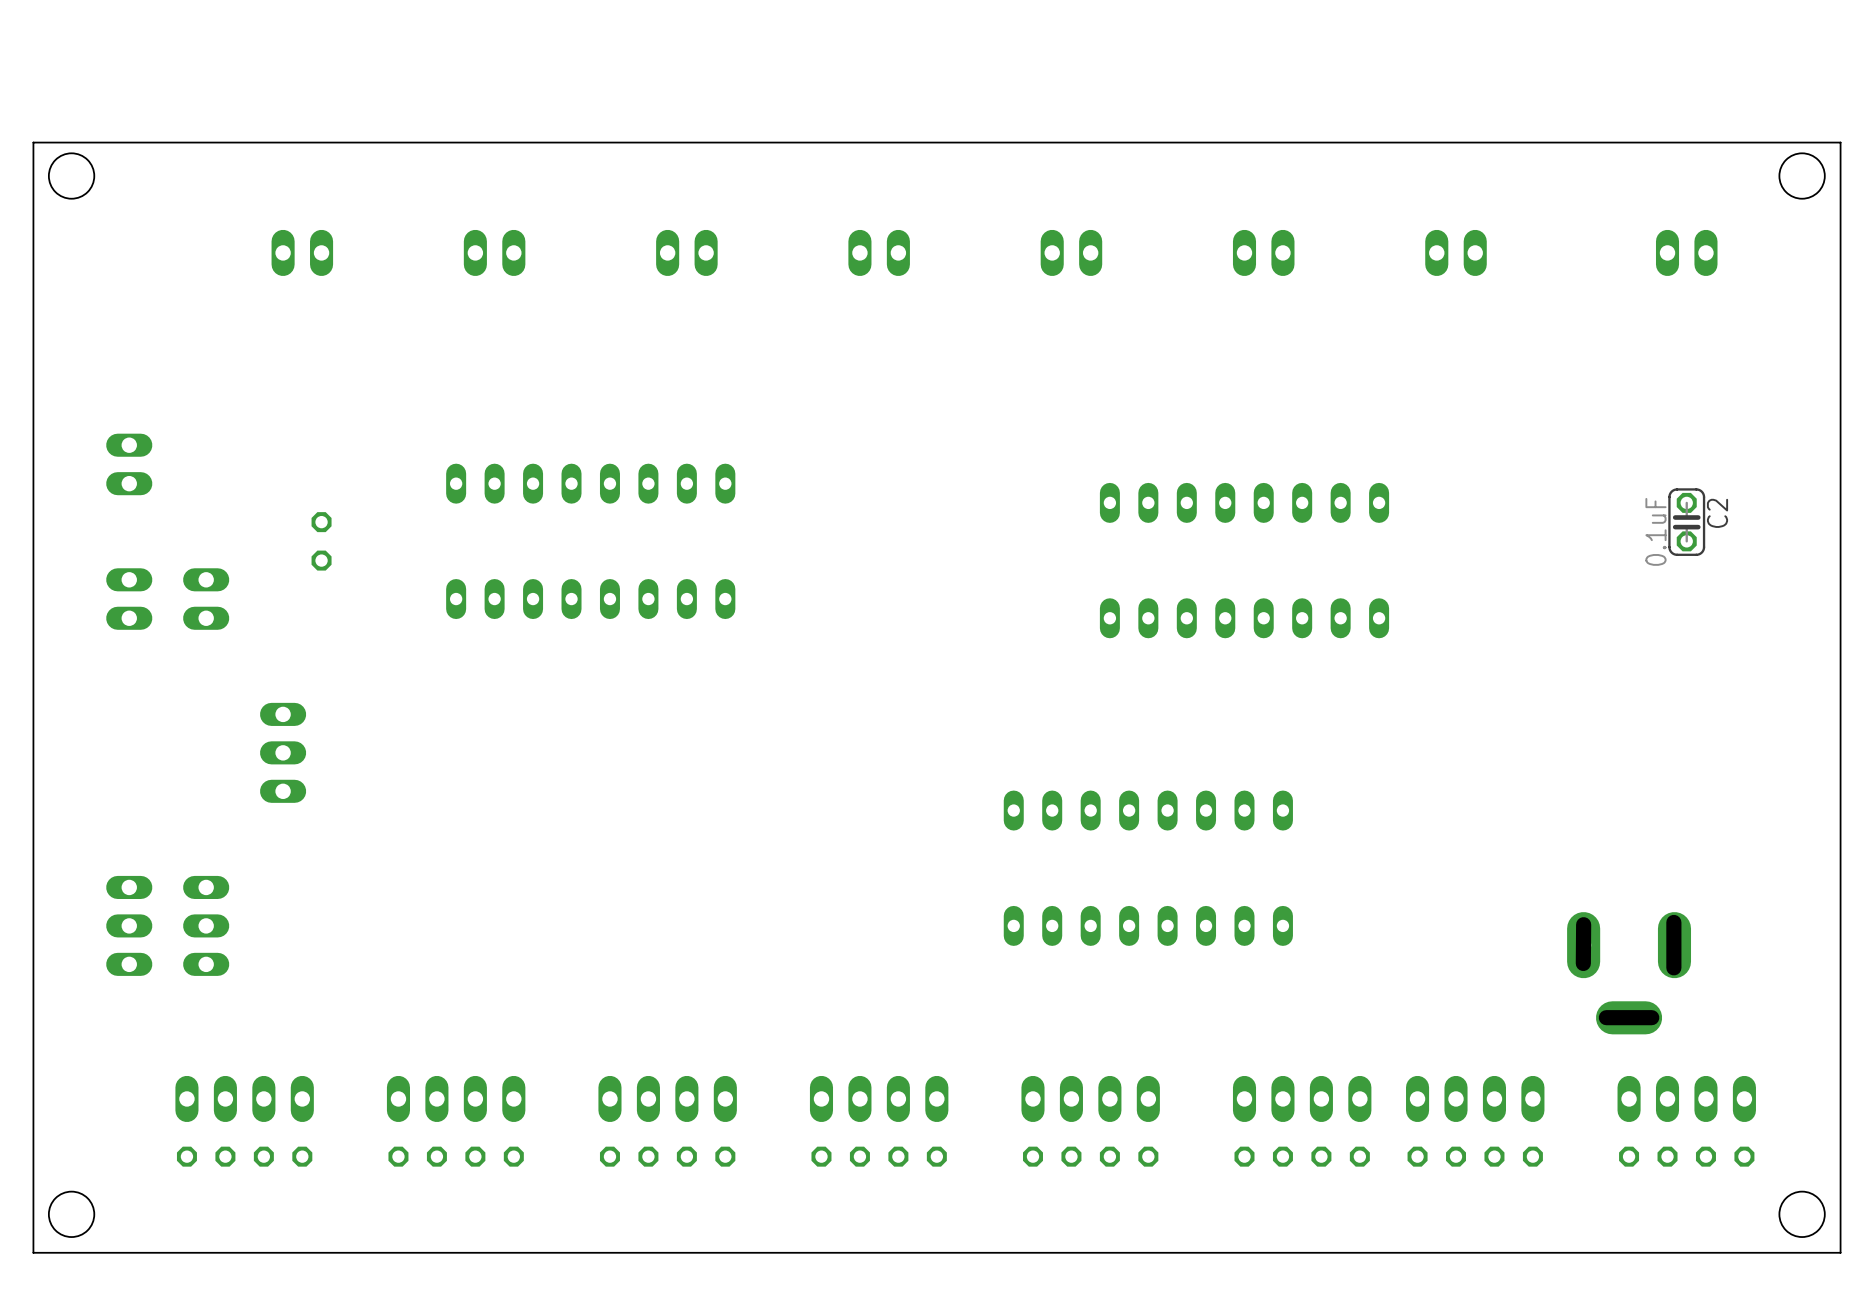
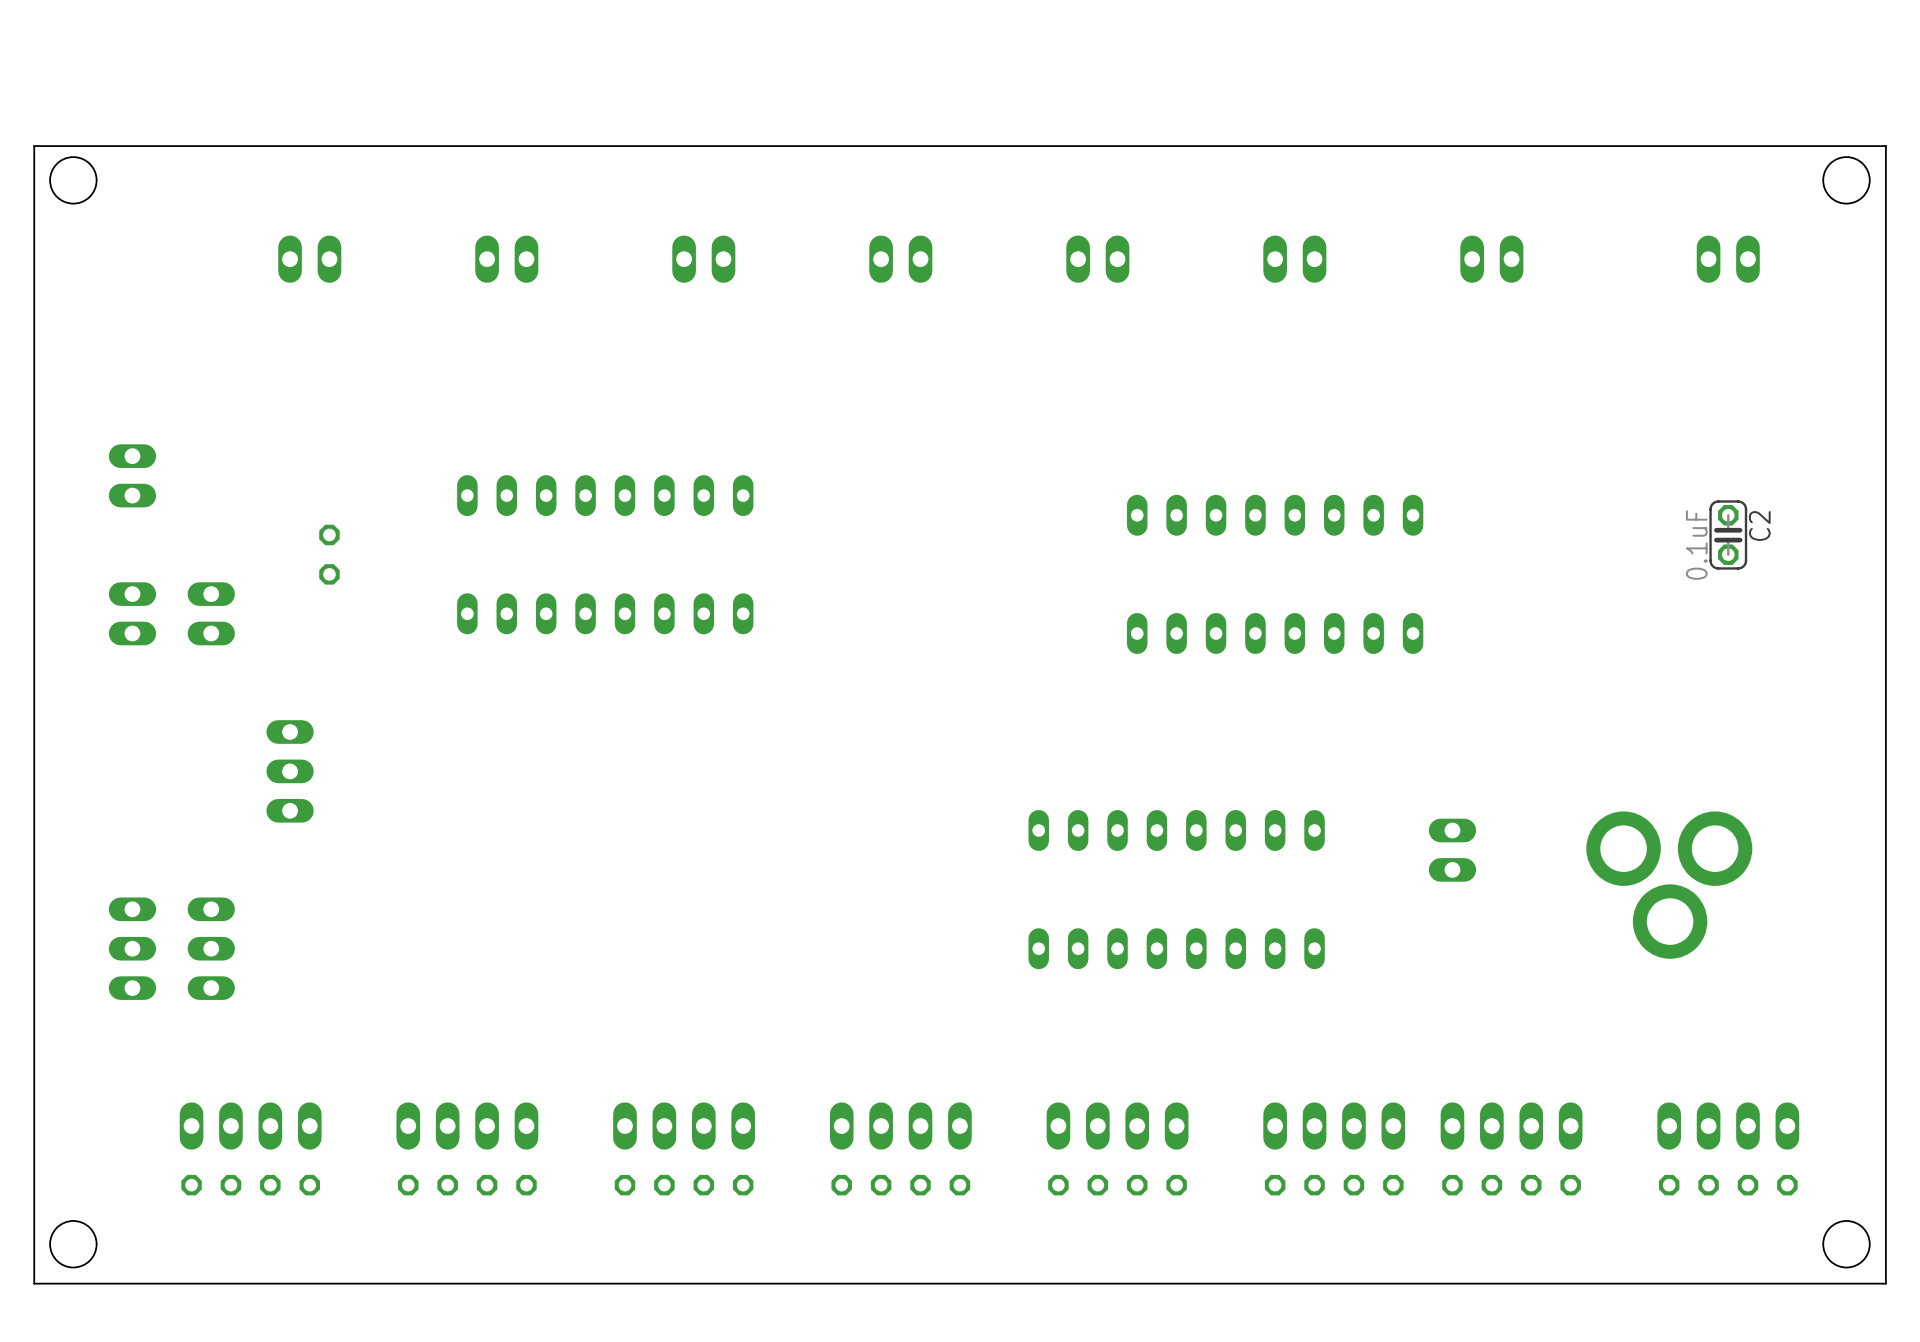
part: none -> (1452, 850)
part: none -> (1669, 885)
part: (1629, 973) -> none

